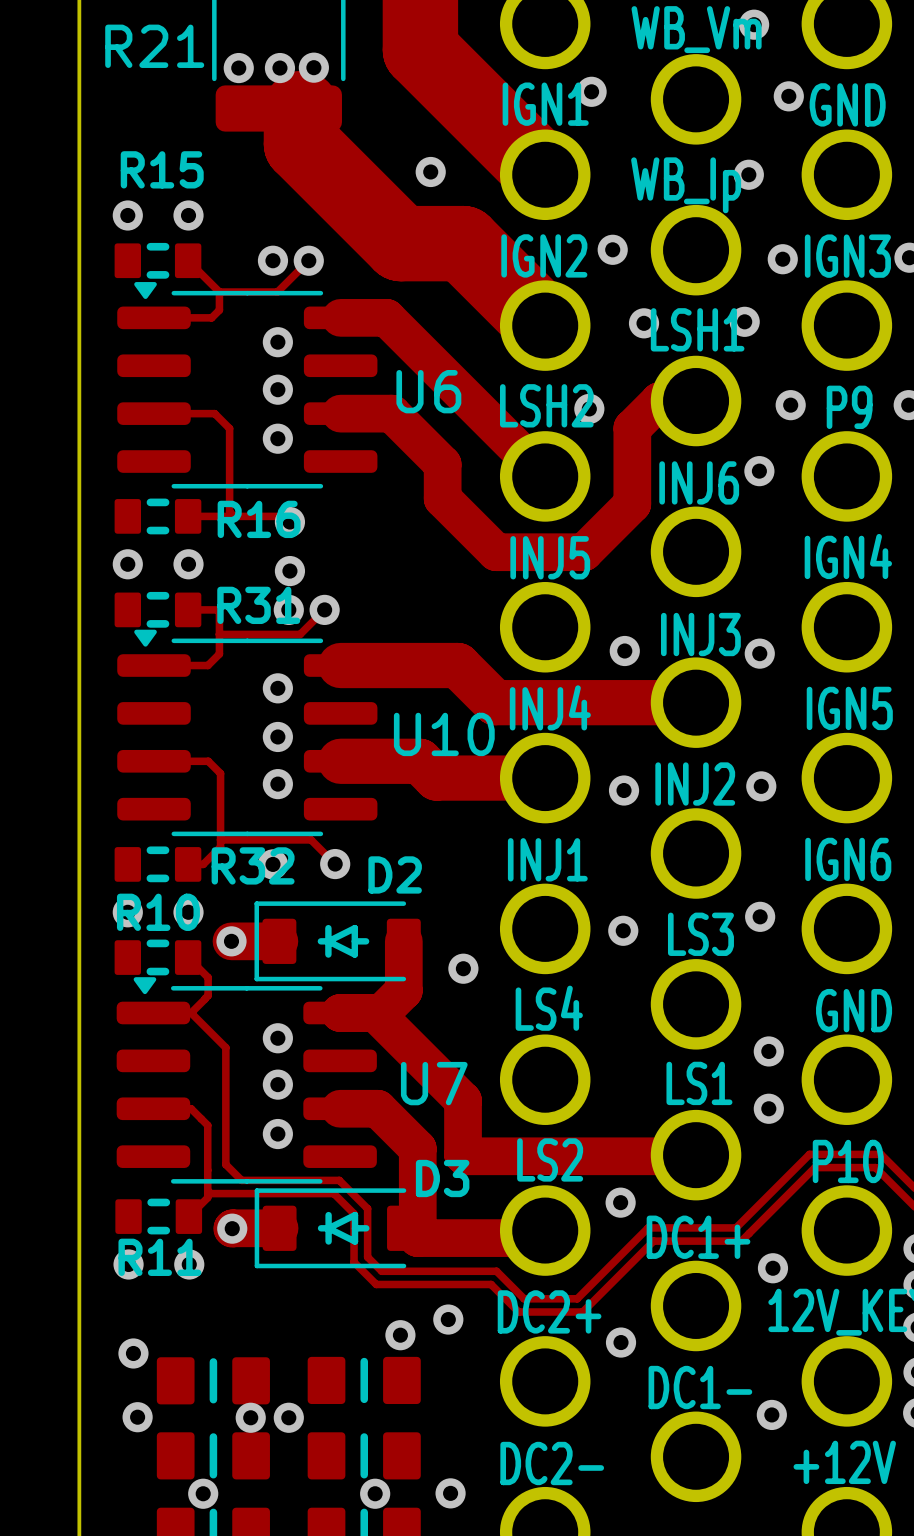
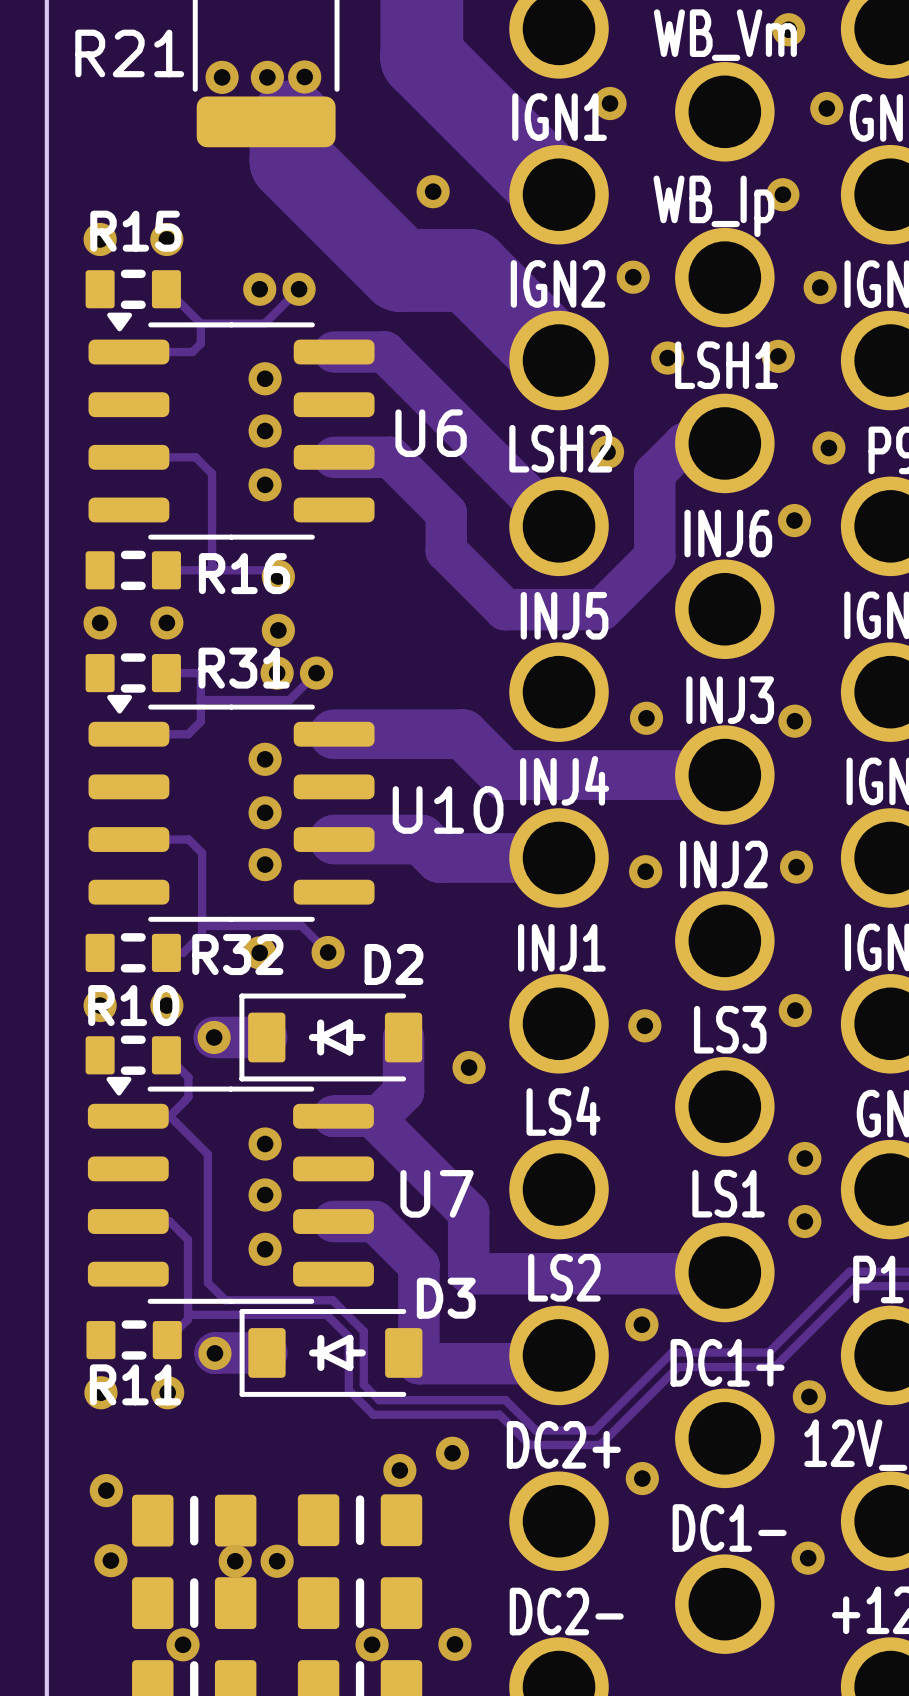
R15 name position: R15 (162, 169) -> R15 (135, 231)

